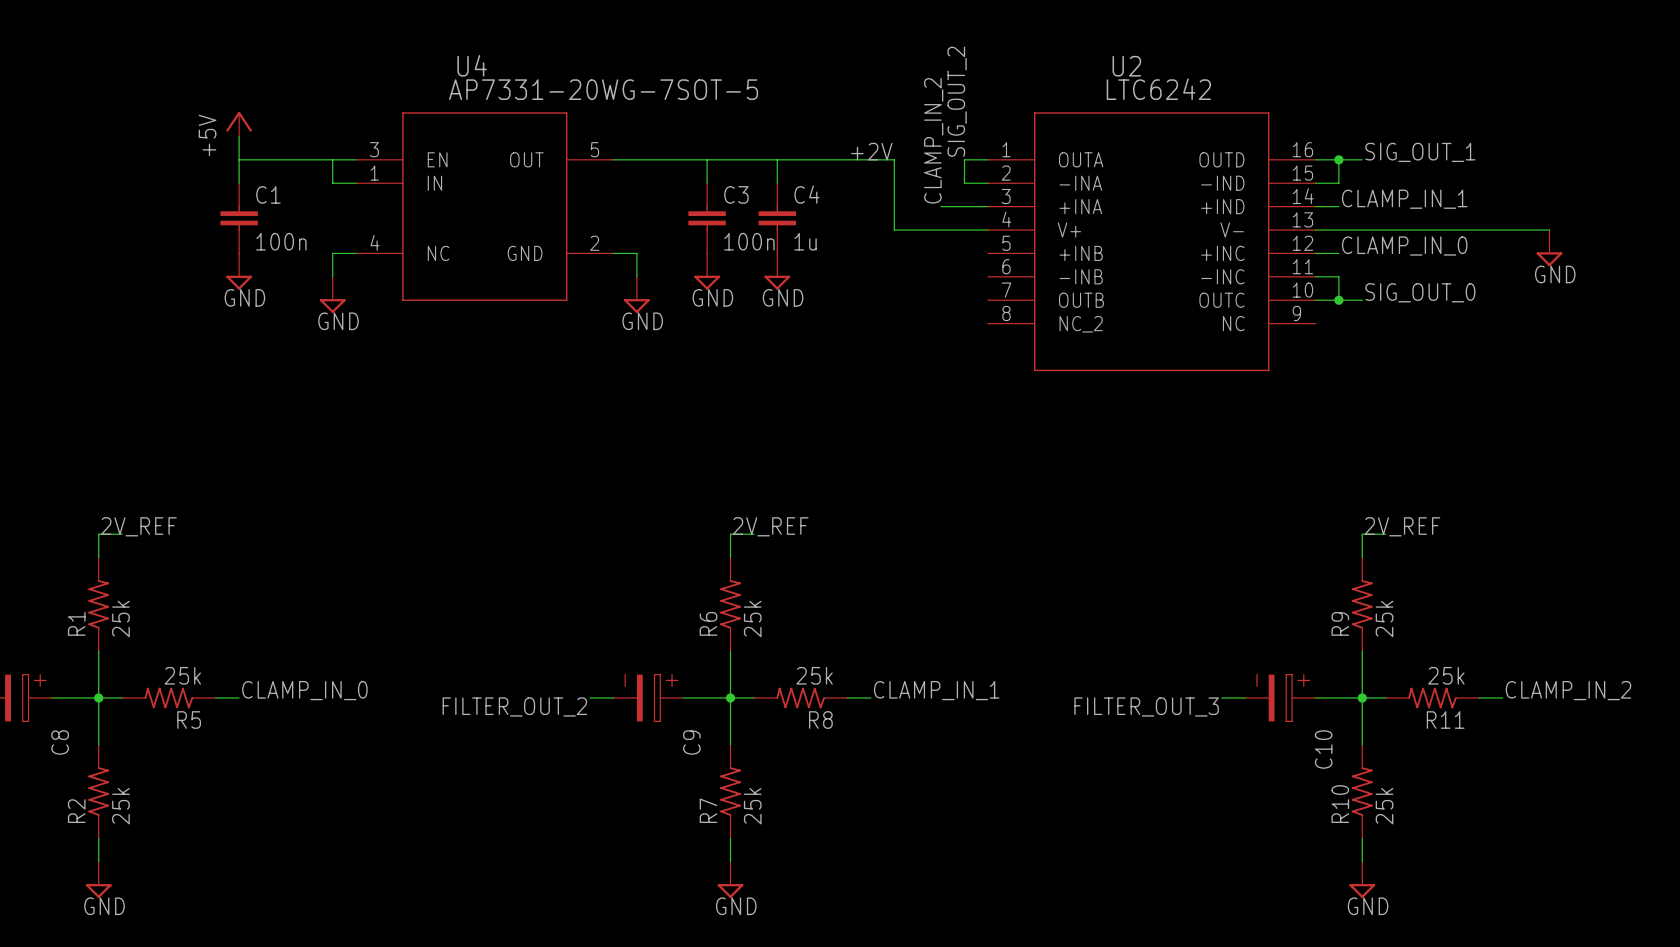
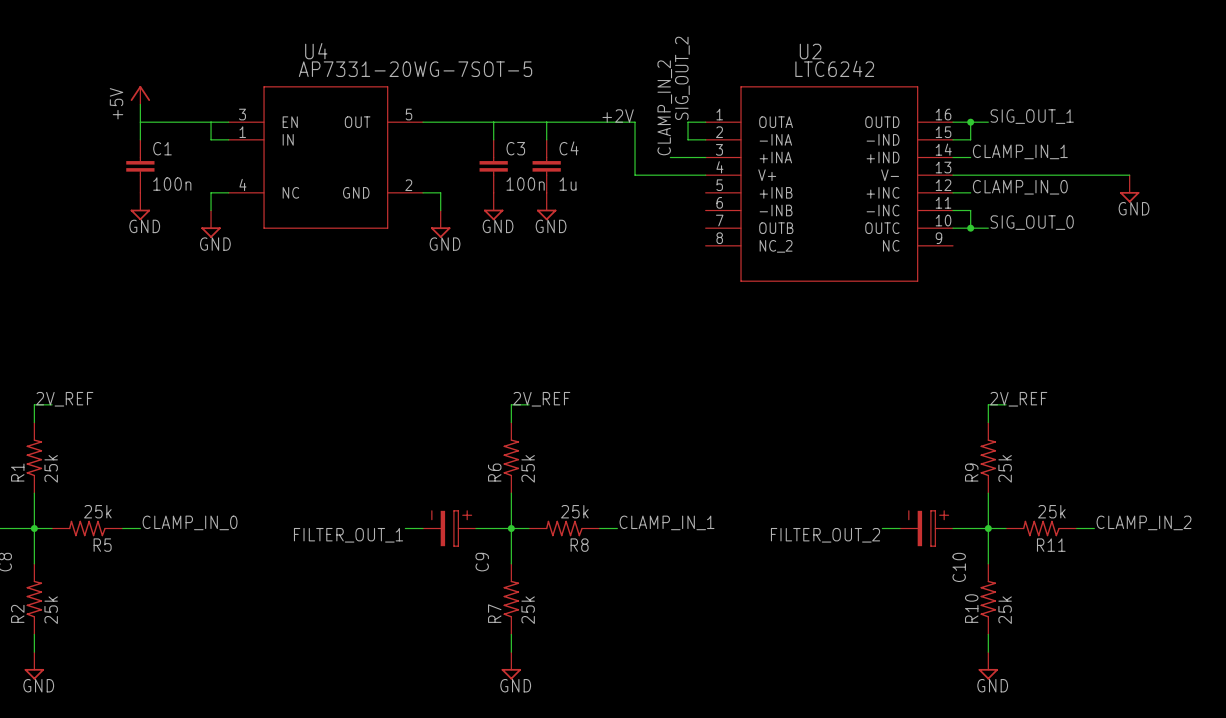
label: FILTER_OUT_2 (514, 706) -> FILTER_OUT_1 (348, 535)
label: FILTER_OUT_3 (1146, 706) -> FILTER_OUT_2 (825, 535)

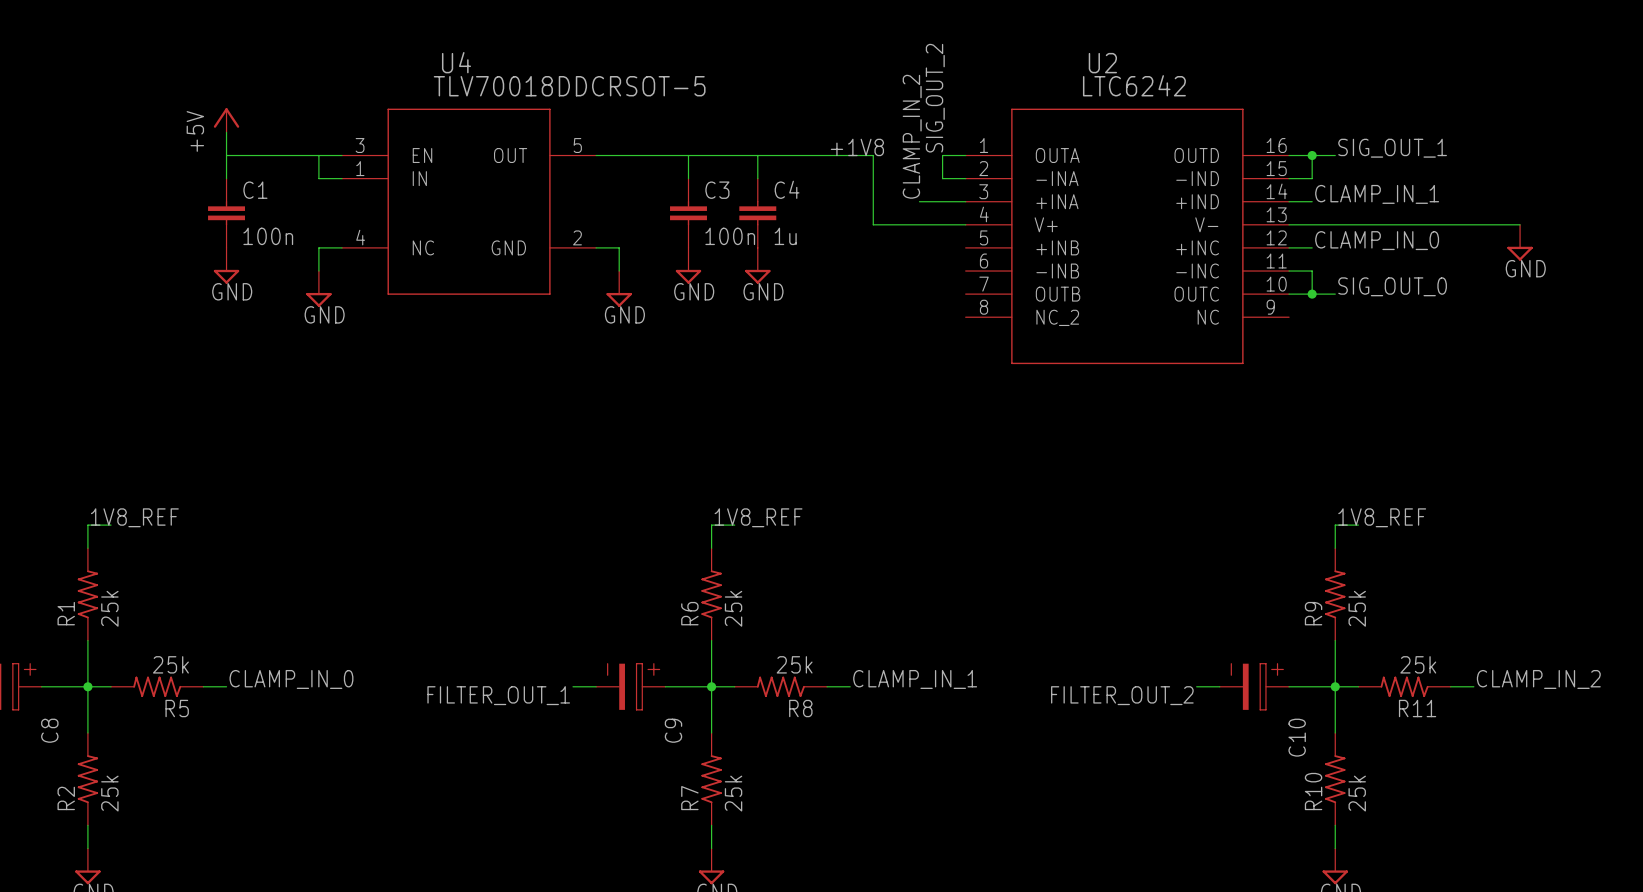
U4 value: AP7331-20WG-7SOT-5 (415, 69) -> TLV70018DDCRSOT-5 (569, 86)
label: +2V (618, 116) -> +1V8 (857, 147)
label: 2V_REF (64, 399) -> 1V8_REF (134, 517)
label: 2V_REF (541, 399) -> 1V8_REF (758, 517)
label: 2V_REF (1018, 399) -> 1V8_REF (1382, 517)

